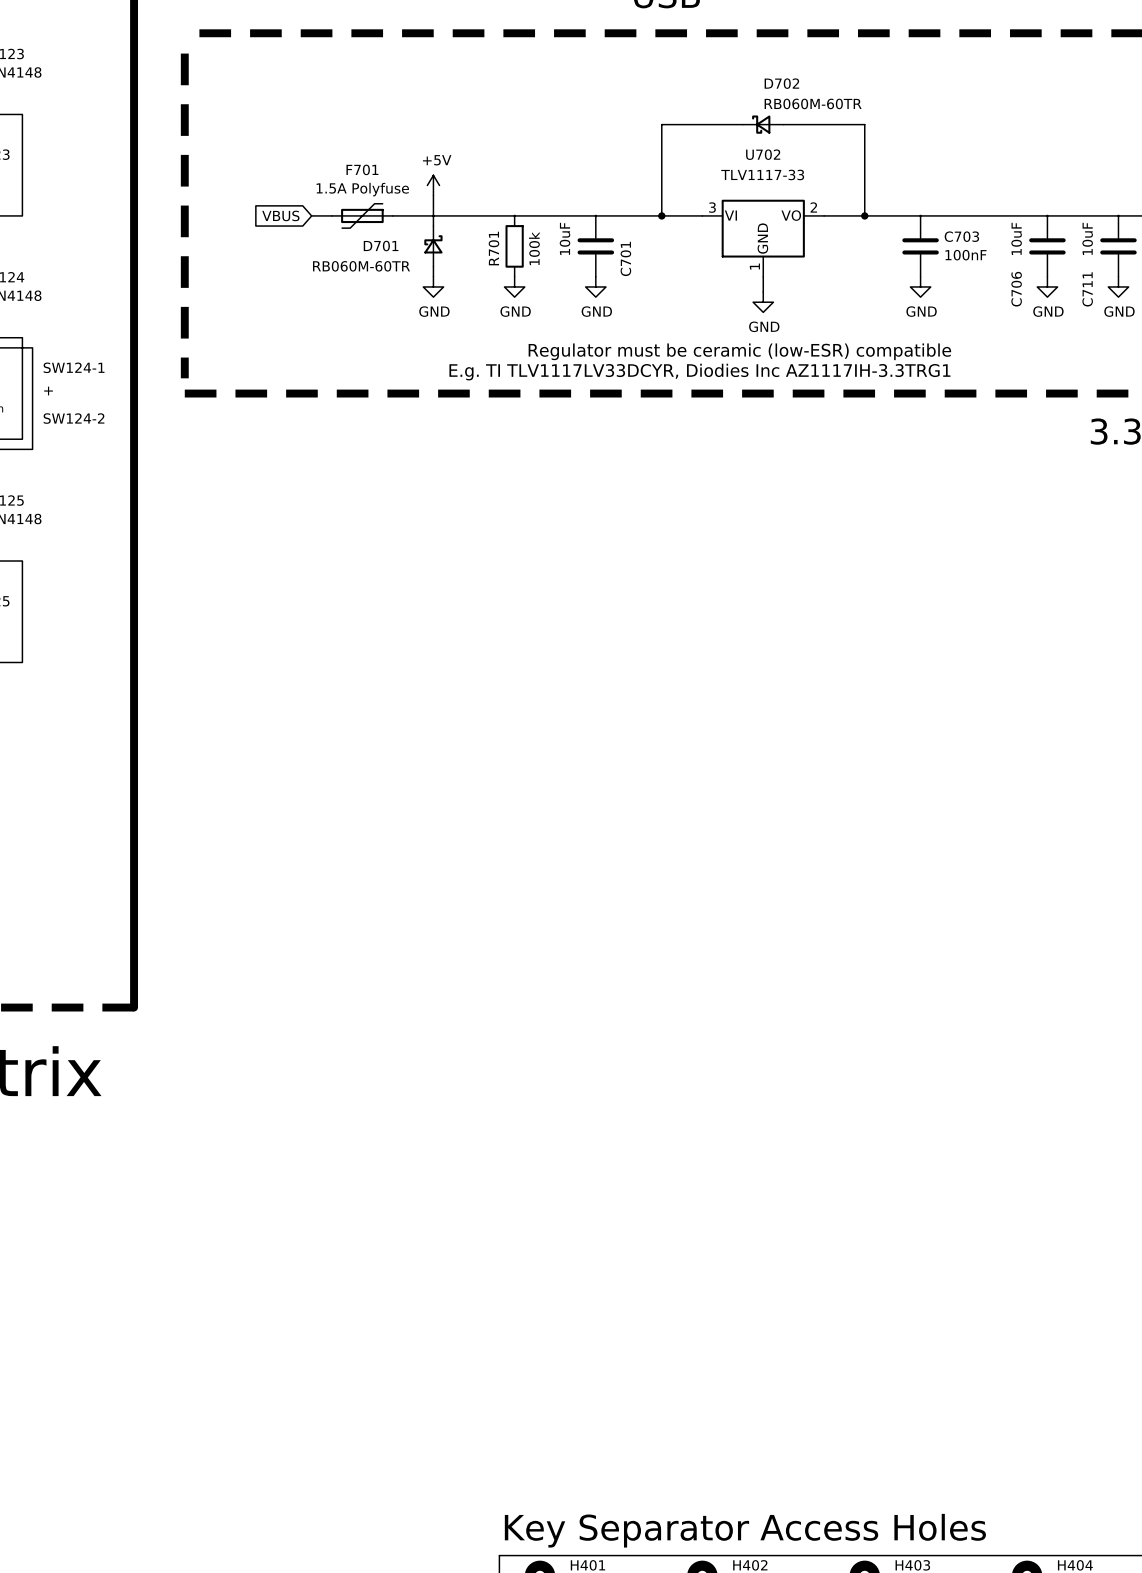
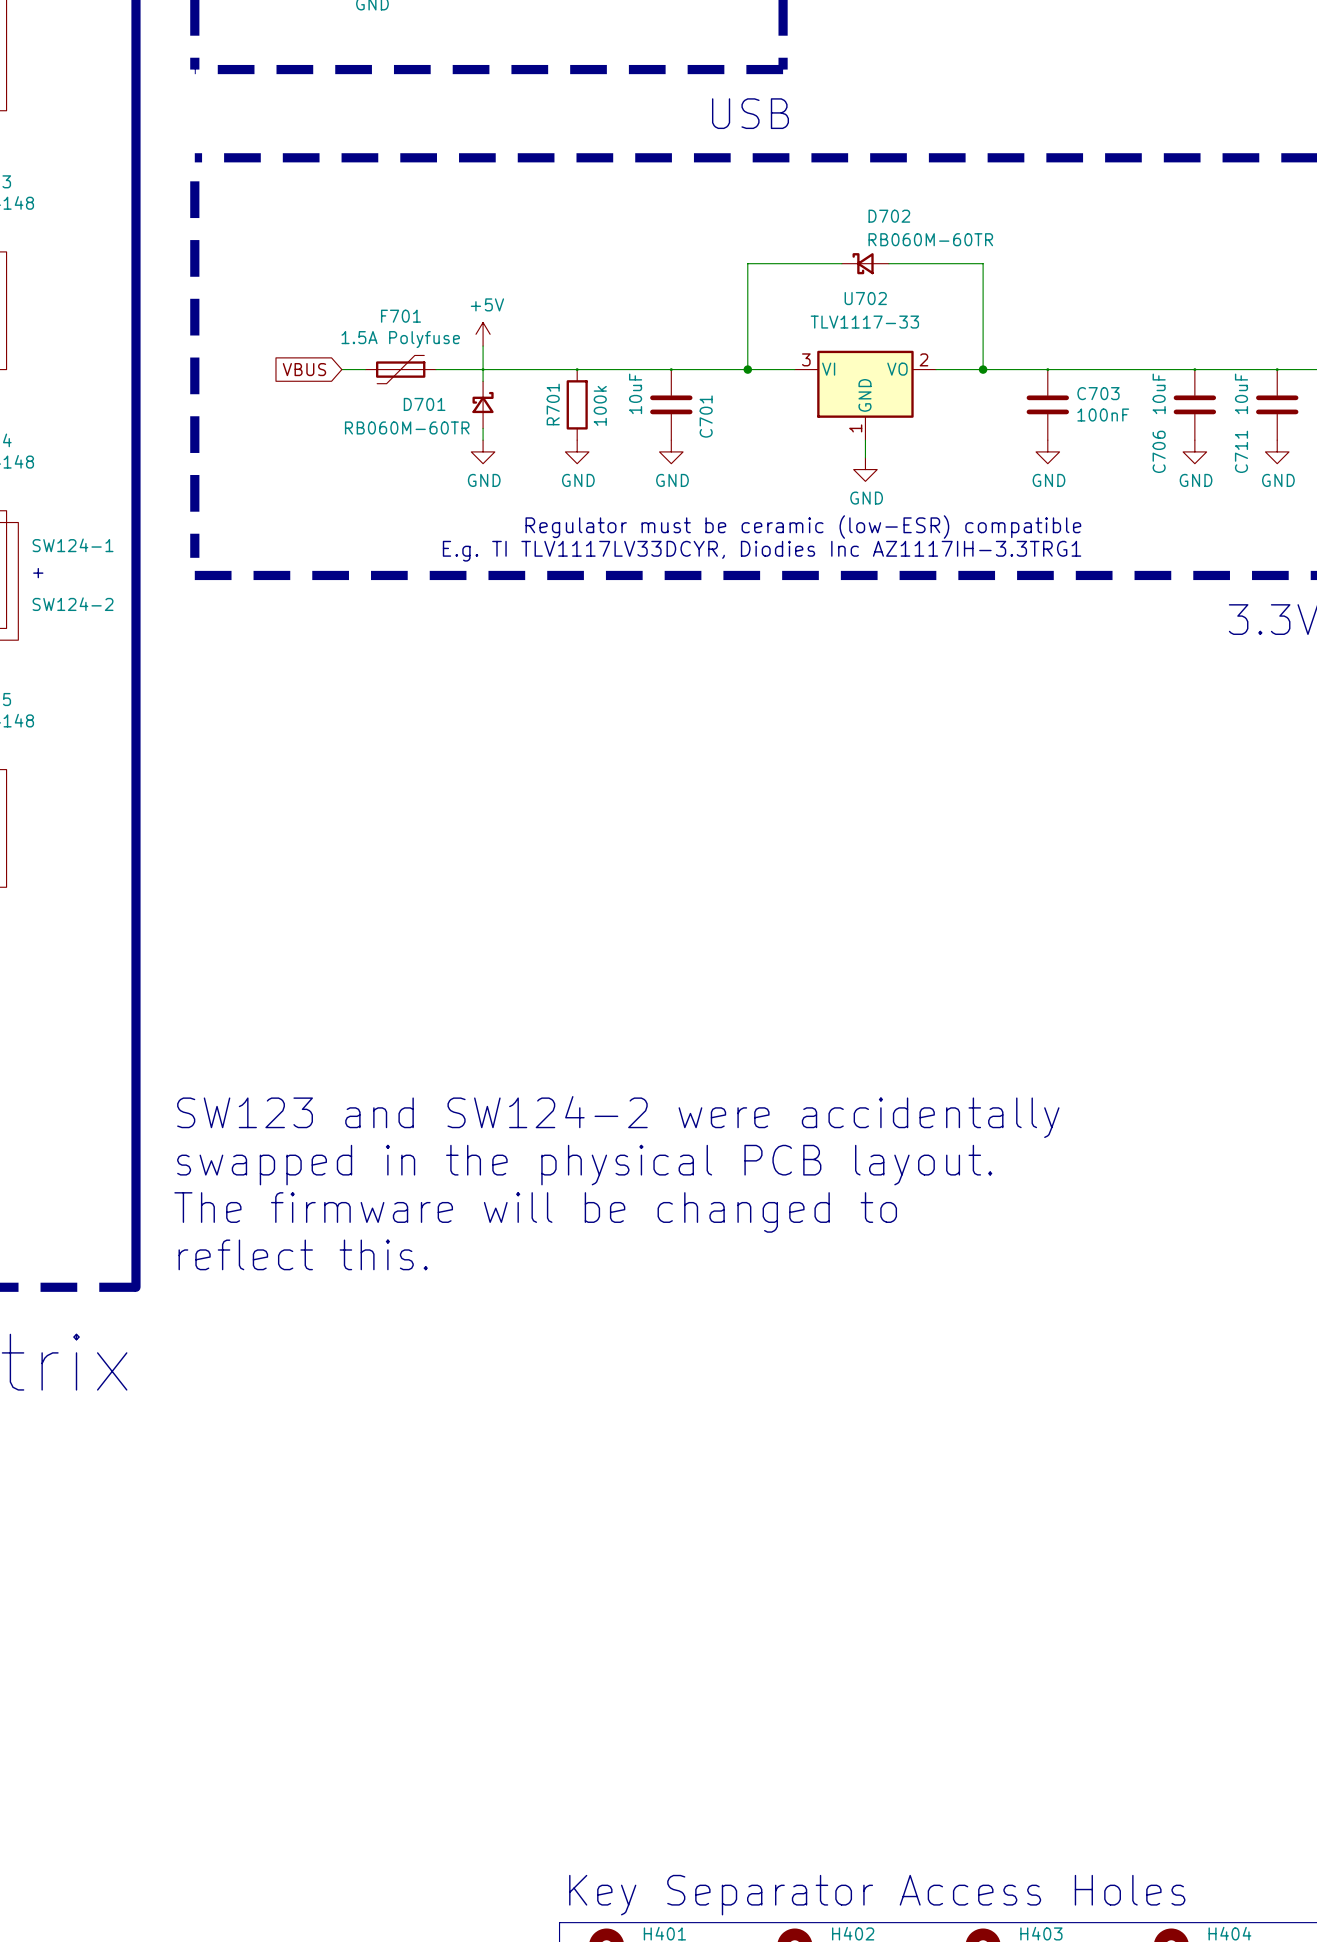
text: none -> SW123 and SW124-2 were accidentally (618, 1117)
text: none -> swapped in the physical PCB layout. (584, 1165)
text: none -> The firmware will be changed to (535, 1212)
text: none -> reflect this. (303, 1254)

